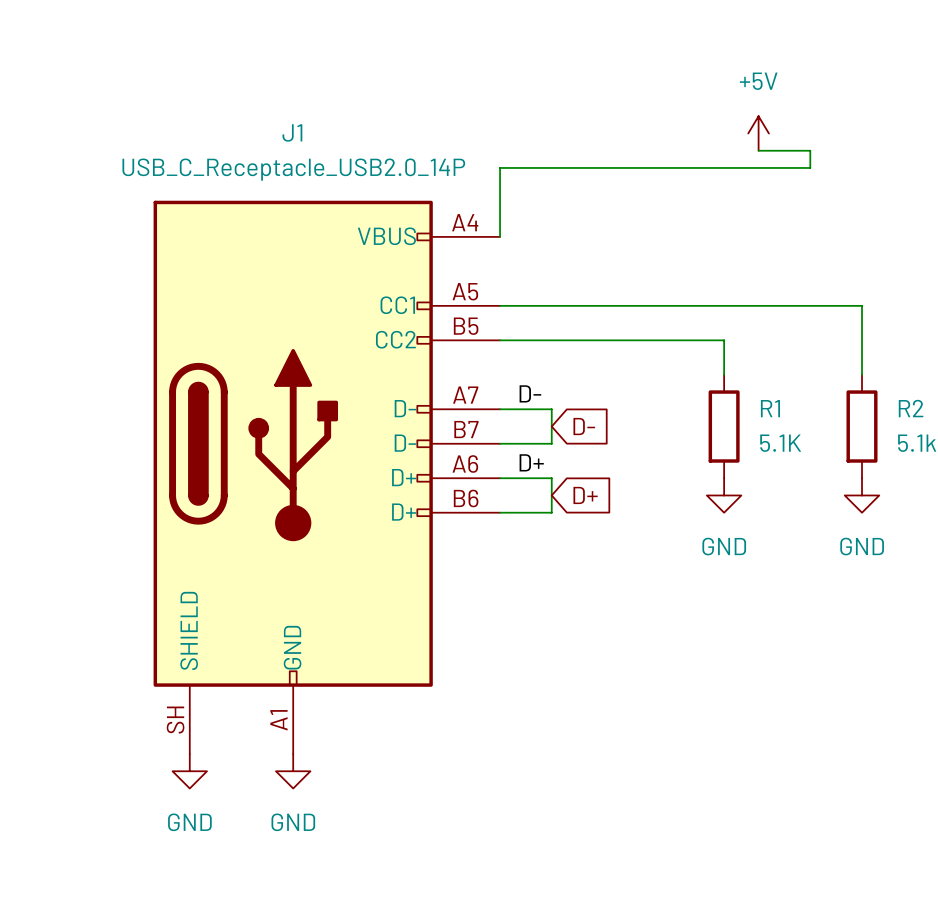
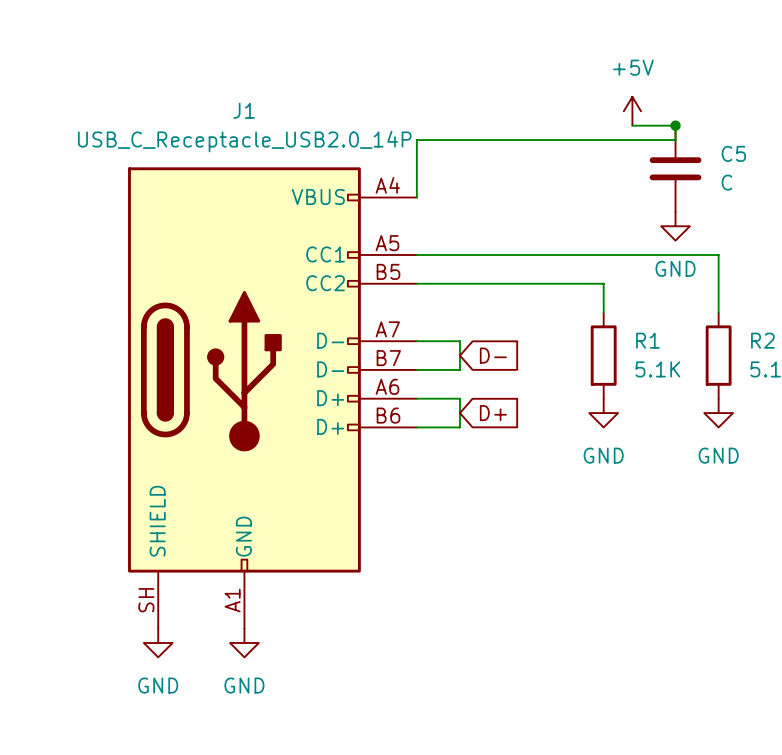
junction: none -> (675, 125)
C5: none -> C (675, 168)
power symbol: none -> GND (675, 226)
label: D- (530, 393) -> none
label: D+ (531, 462) -> none

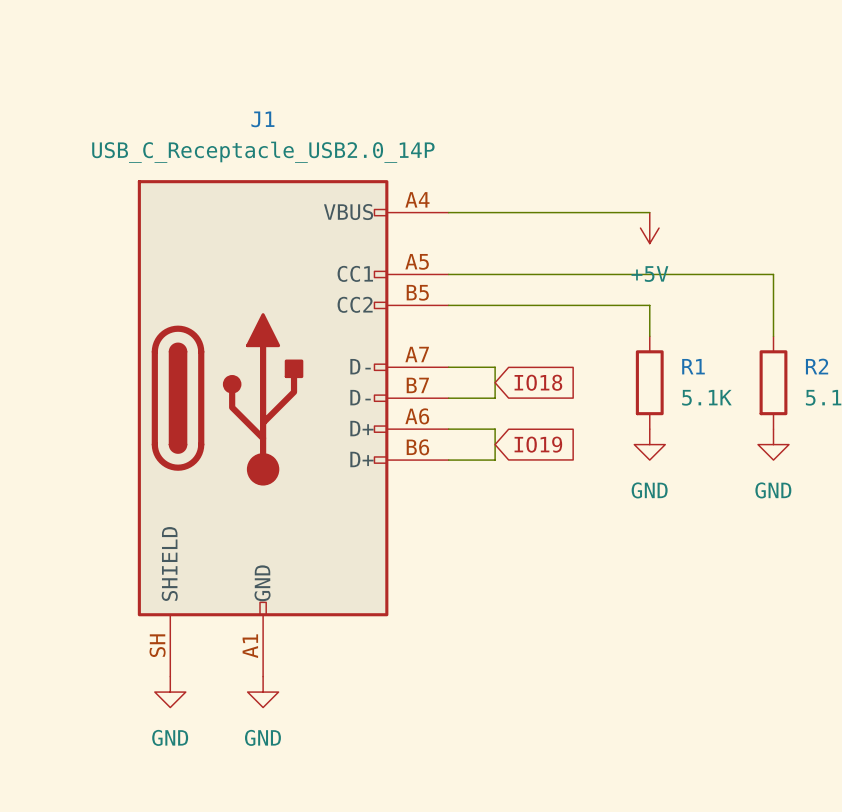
power symbol rotation: 0° (632, 111) -> 180° (649, 228)
power symbol position: +5V (632, 111) -> +5V (649, 228)
wire: (632, 125) (675, 125) (675, 140) (416, 140) (416, 197) -> (649, 212) (448, 212)
junction: (675, 125) -> none
C5: C (675, 168) -> none
power symbol: GND (675, 226) -> none
global label: D- (493, 355) -> IO18 (538, 382)
global label: D+ (493, 413) -> IO19 (538, 444)

